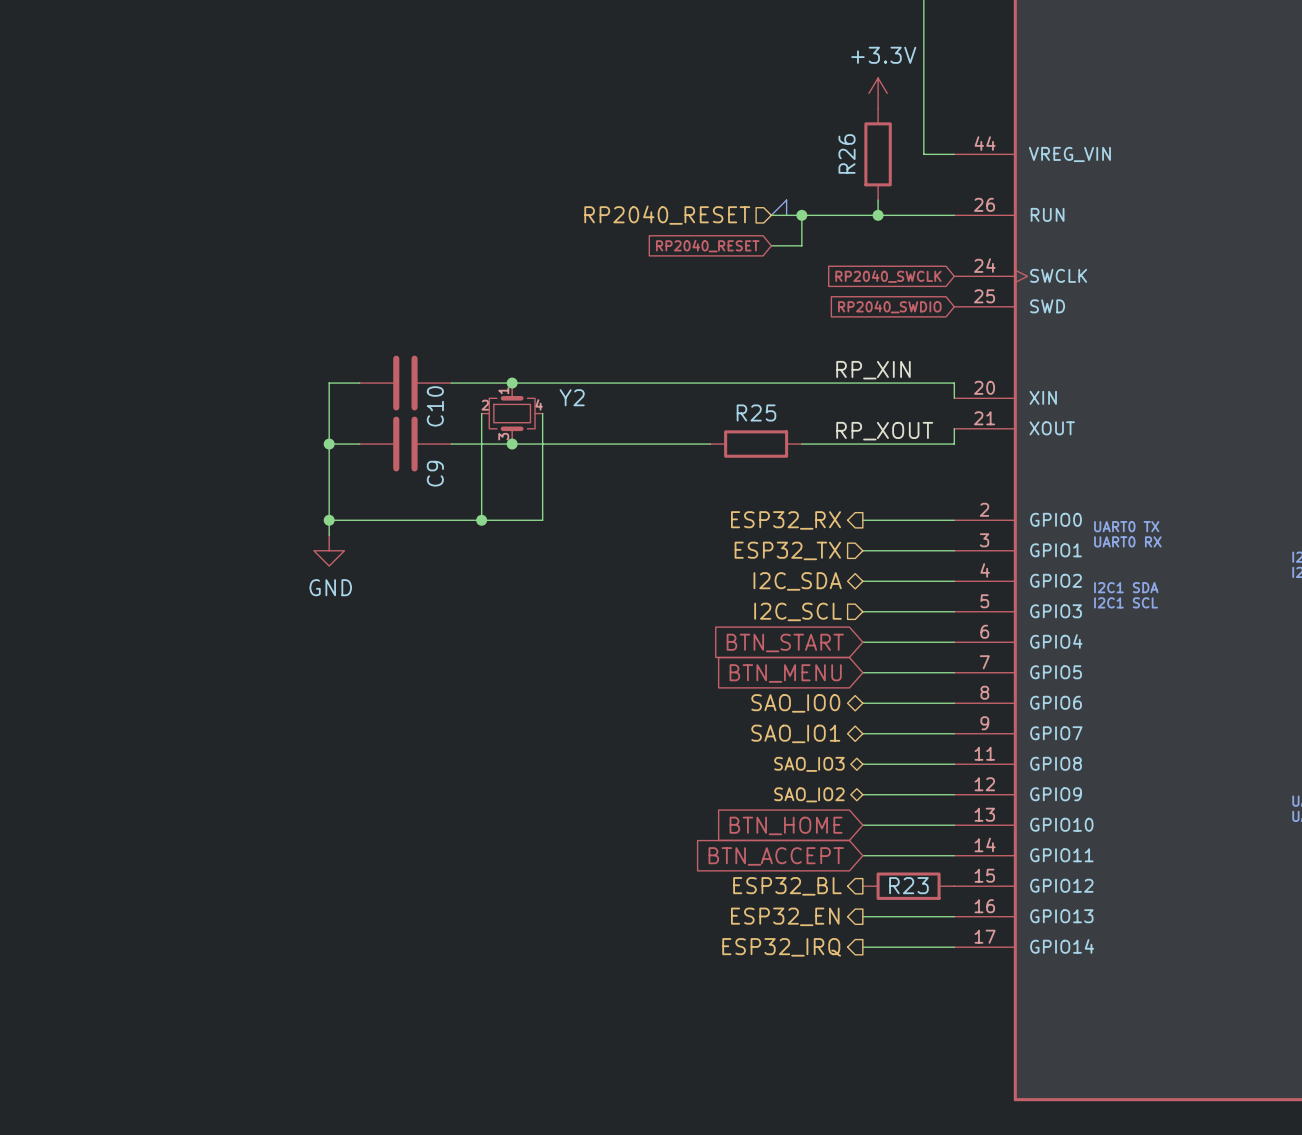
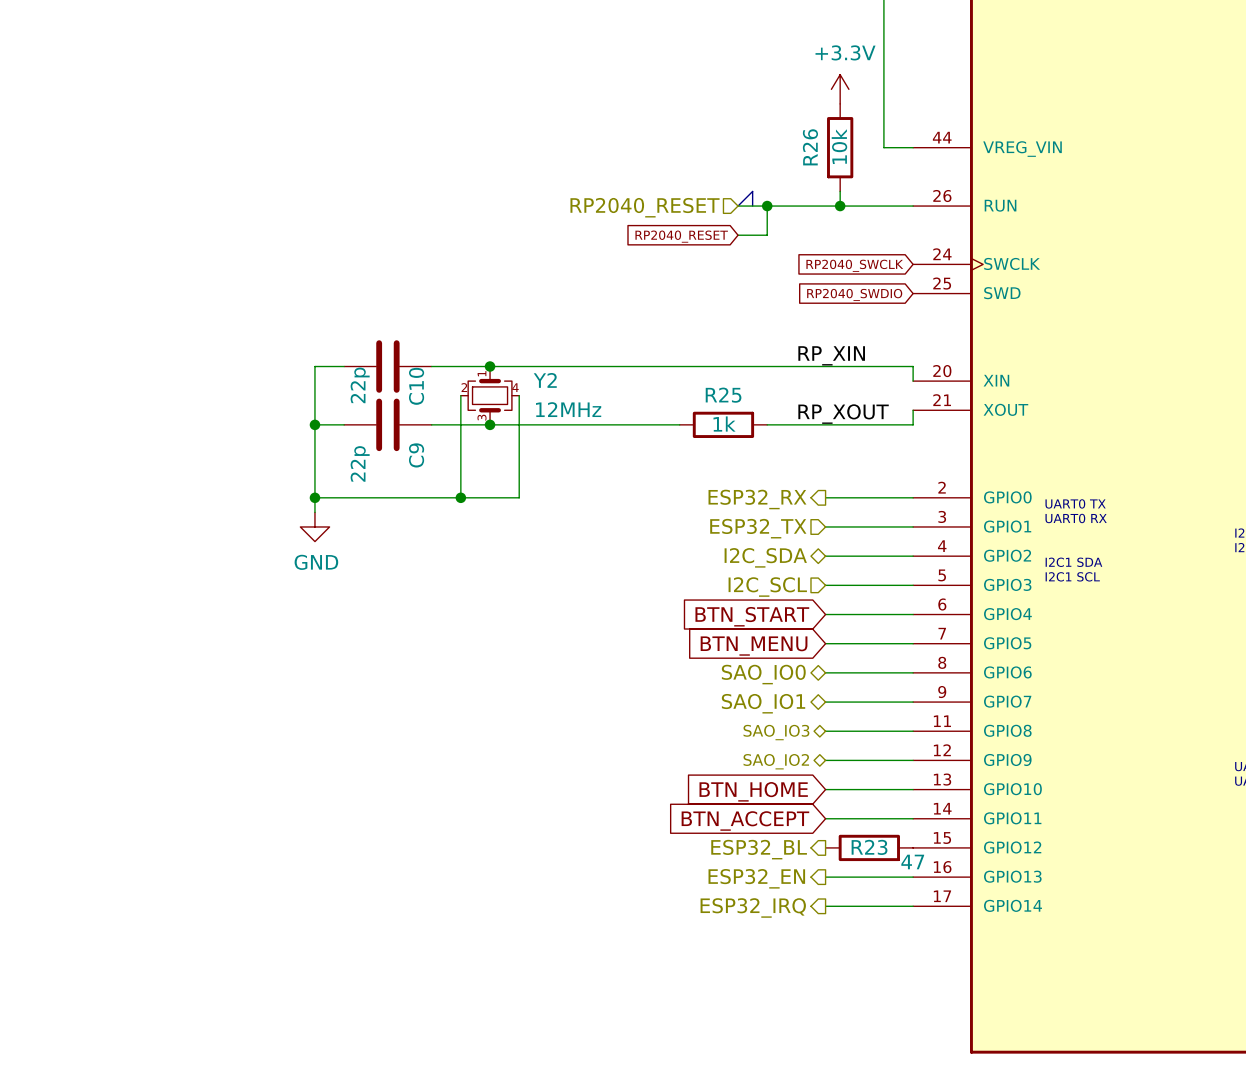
R26 value: none -> 10k (839, 146)
C10 value: none -> 22p (360, 385)
Y2 value: none -> 12MHz (568, 409)
R25 value: none -> 1k (724, 424)
C9 value: none -> 22p (360, 463)
R23 value: none -> 47 (912, 861)

